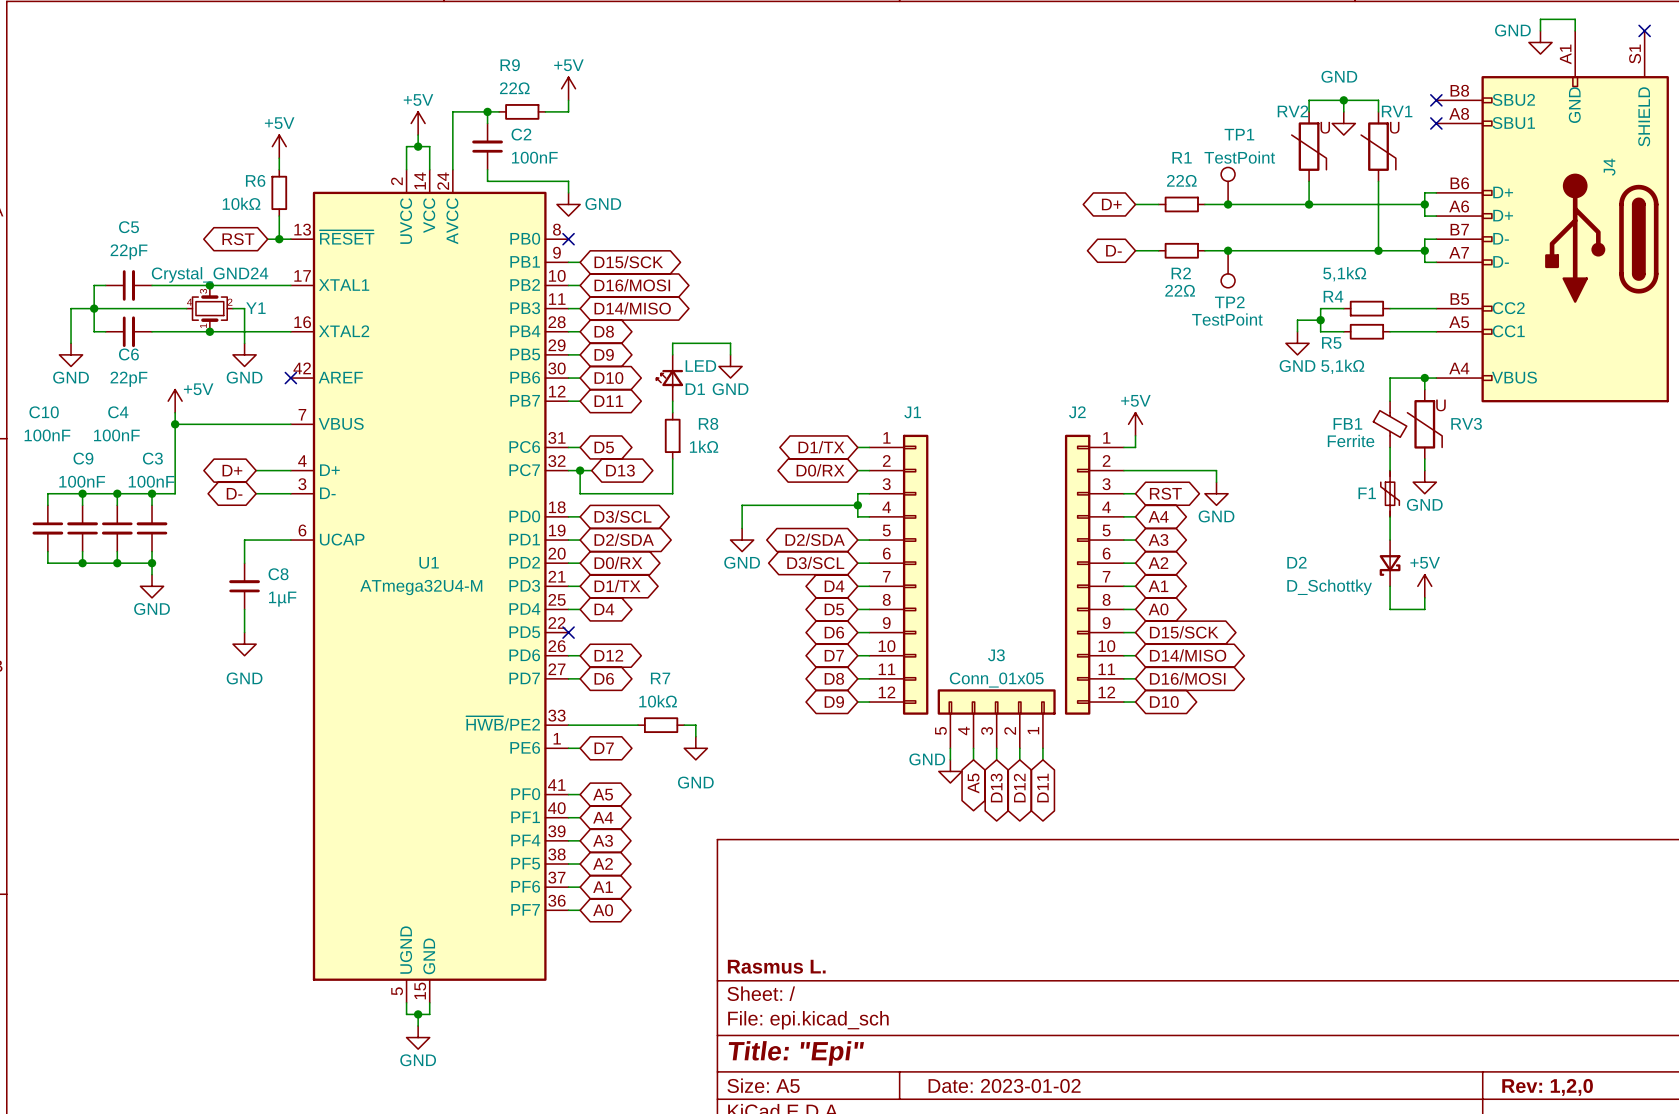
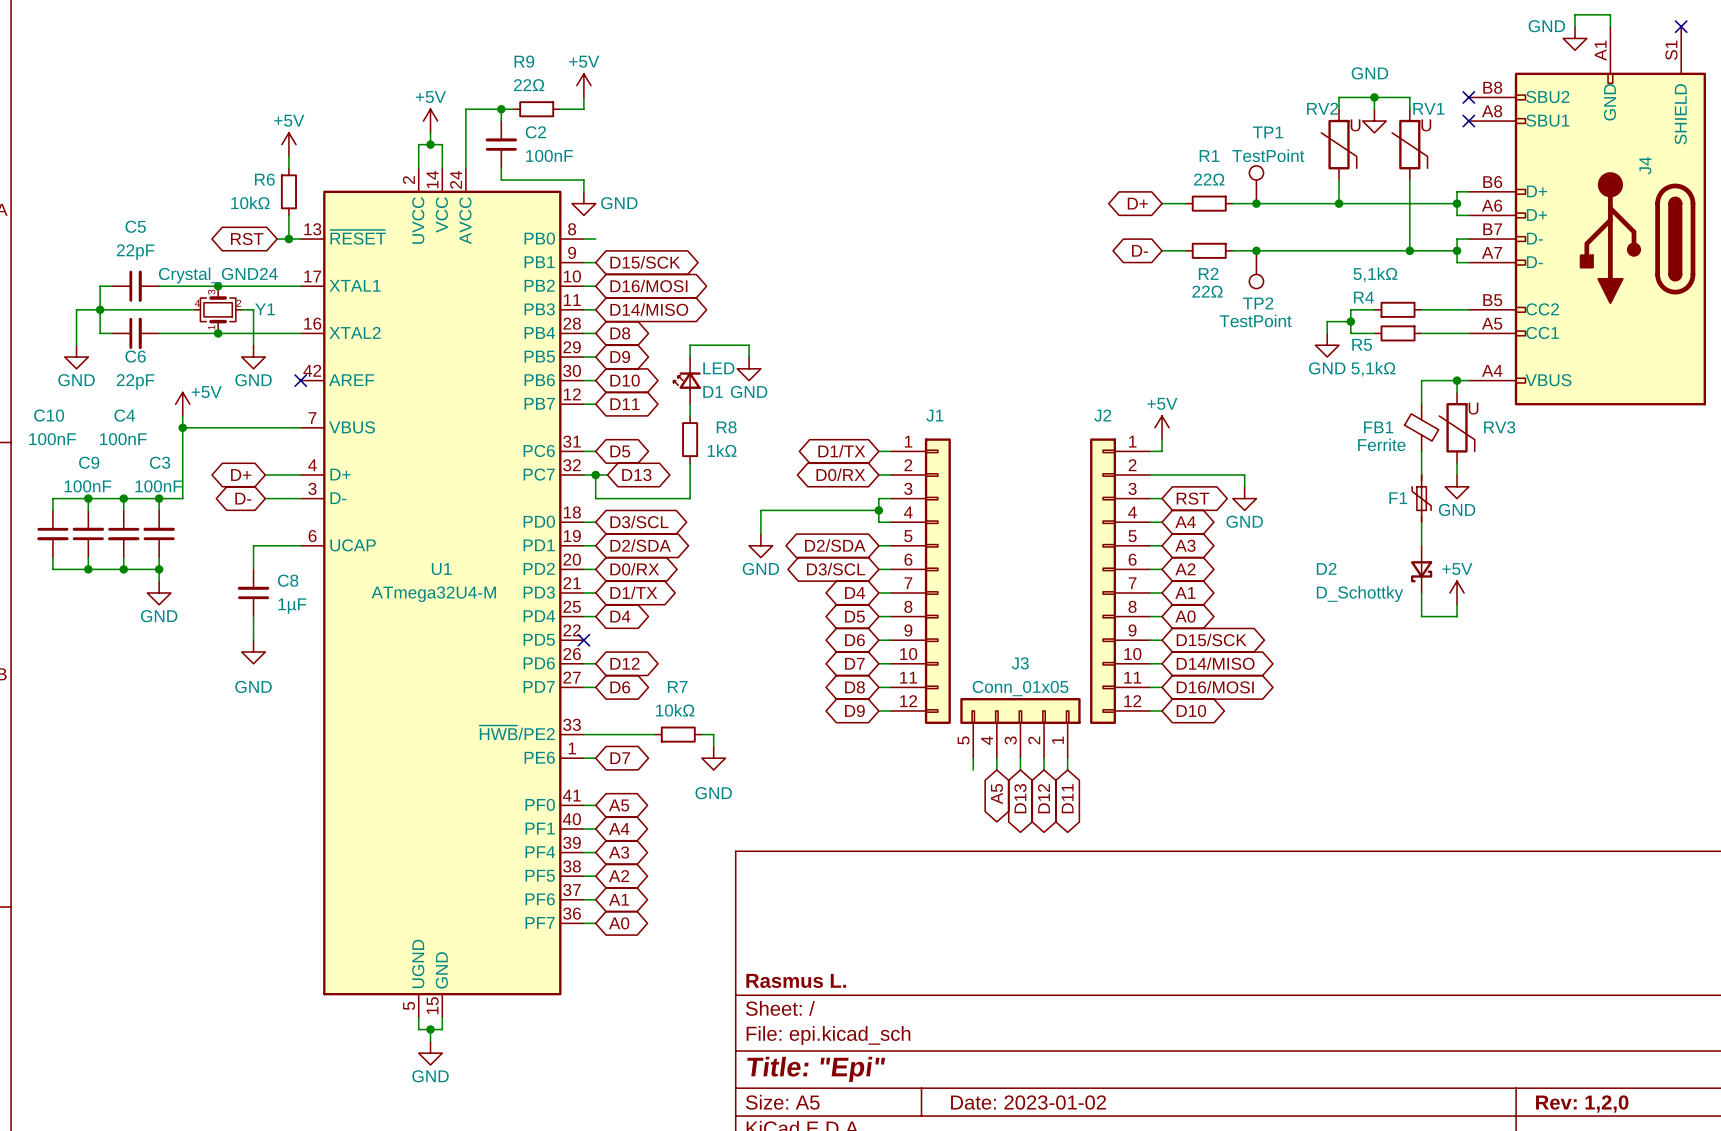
wire: none -> (583, 239) (595, 239)
no-connect mark: (568, 239) -> none
power symbol: GND (950, 771) -> none

